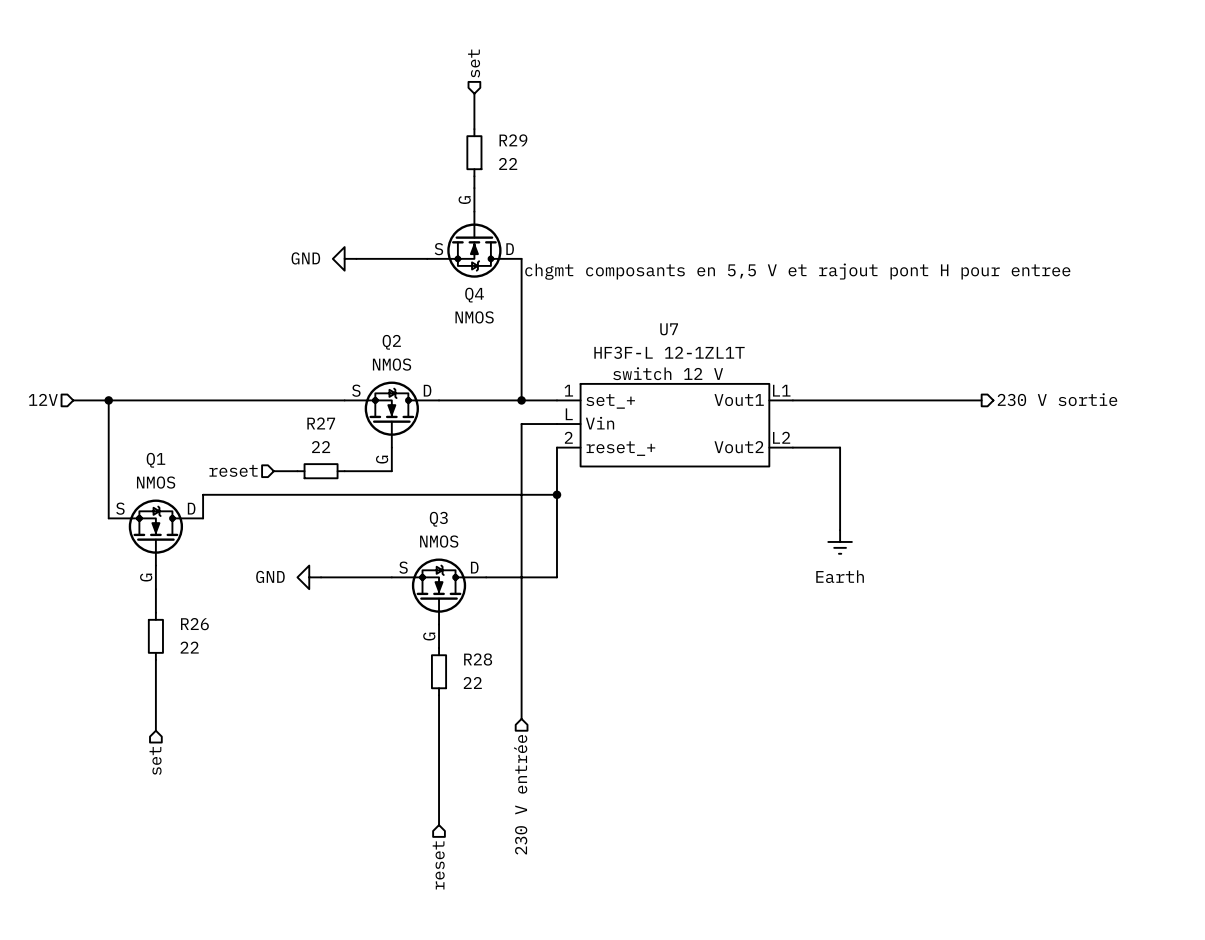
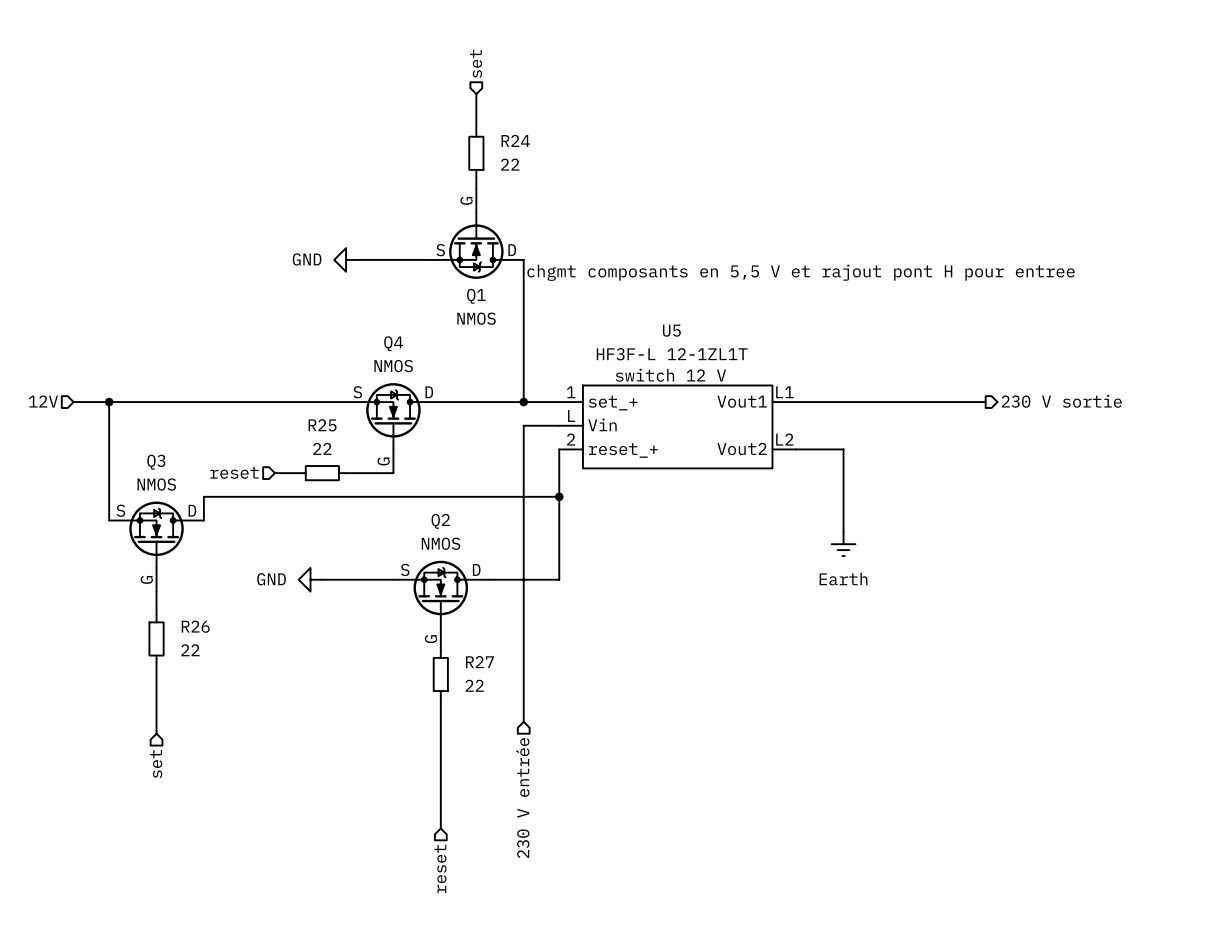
R29 name: R29 (513, 140) -> R24 (515, 140)
Q4 name: Q4 (474, 295) -> Q1 (476, 296)
U7 name: U7 (669, 329) -> U5 (671, 330)
Q2 name: Q2 (391, 342) -> Q4 (393, 343)
R27 name: R27 (321, 423) -> R25 (322, 425)
Q1 name: Q1 (155, 460) -> Q3 (156, 462)
Q3 name: Q3 (438, 519) -> Q2 (440, 521)
R28 name: R28 (478, 659) -> R27 (479, 662)

